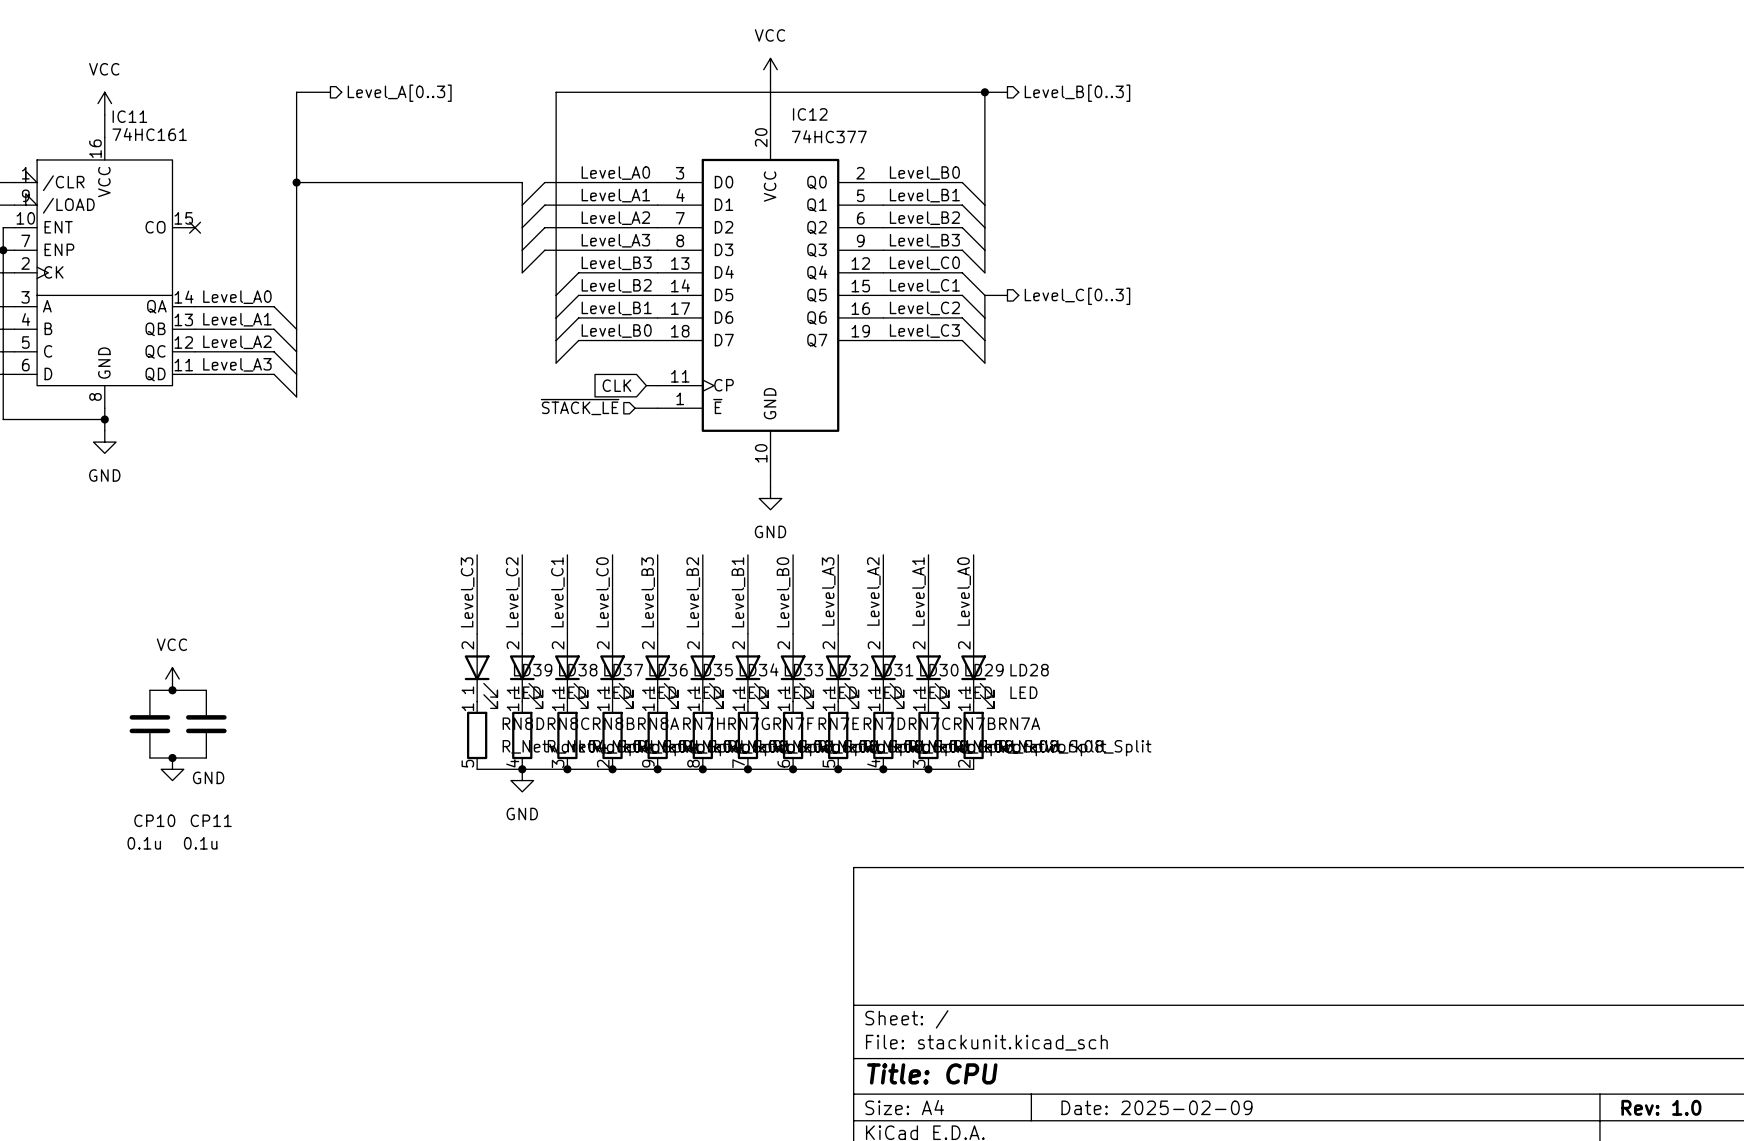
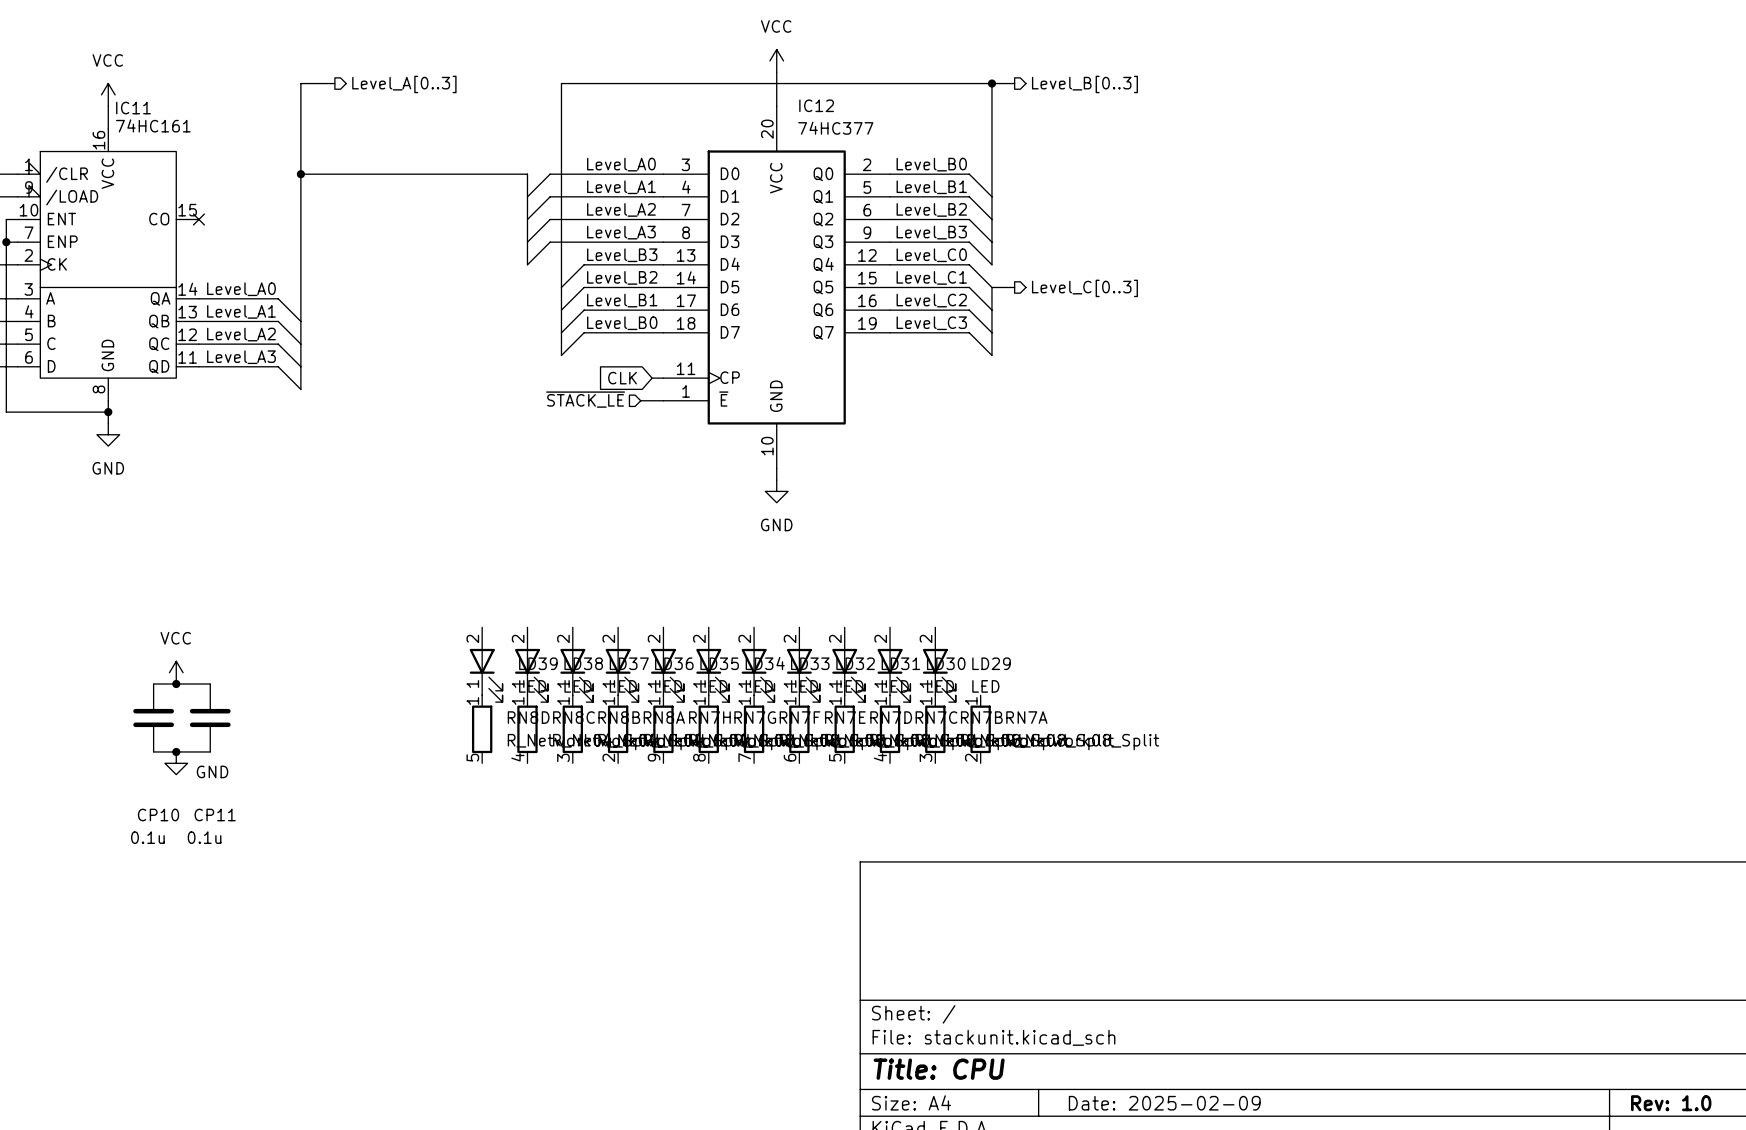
wire: (477, 554) (477, 633) -> none
wire: (522, 554) (522, 633) -> none
wire: (567, 554) (567, 633) -> none
wire: (612, 554) (612, 633) -> none
wire: (657, 554) (657, 633) -> none
wire: (702, 554) (702, 633) -> none
wire: (747, 554) (747, 633) -> none
wire: (793, 554) (793, 633) -> none
wire: (838, 554) (838, 633) -> none
wire: (883, 554) (883, 633) -> none
wire: (928, 554) (928, 633) -> none
wire: (973, 554) (973, 633) -> none
label: Level_A3 (828, 591) -> none
label: Level_A2 (873, 591) -> none
label: Level_A1 (918, 591) -> none
label: Level_A0 (964, 591) -> none
label: Level_C3 (467, 592) -> none
label: Level_C2 (512, 592) -> none
label: Level_C1 (557, 592) -> none
label: Level_C0 (603, 592) -> none
label: Level_B3 (648, 592) -> none
label: Level_B2 (693, 592) -> none
label: Level_B1 (738, 592) -> none
label: Level_B0 (783, 592) -> none
LD28: LED (977, 671) -> none
wire: (477, 769) (973, 769) -> none
junction: (522, 769) -> none
junction: (567, 769) -> none
junction: (612, 769) -> none
junction: (657, 769) -> none
junction: (702, 769) -> none
junction: (747, 769) -> none
junction: (793, 769) -> none
junction: (838, 769) -> none
junction: (883, 769) -> none
junction: (928, 769) -> none
power symbol: GND (522, 780) -> none

